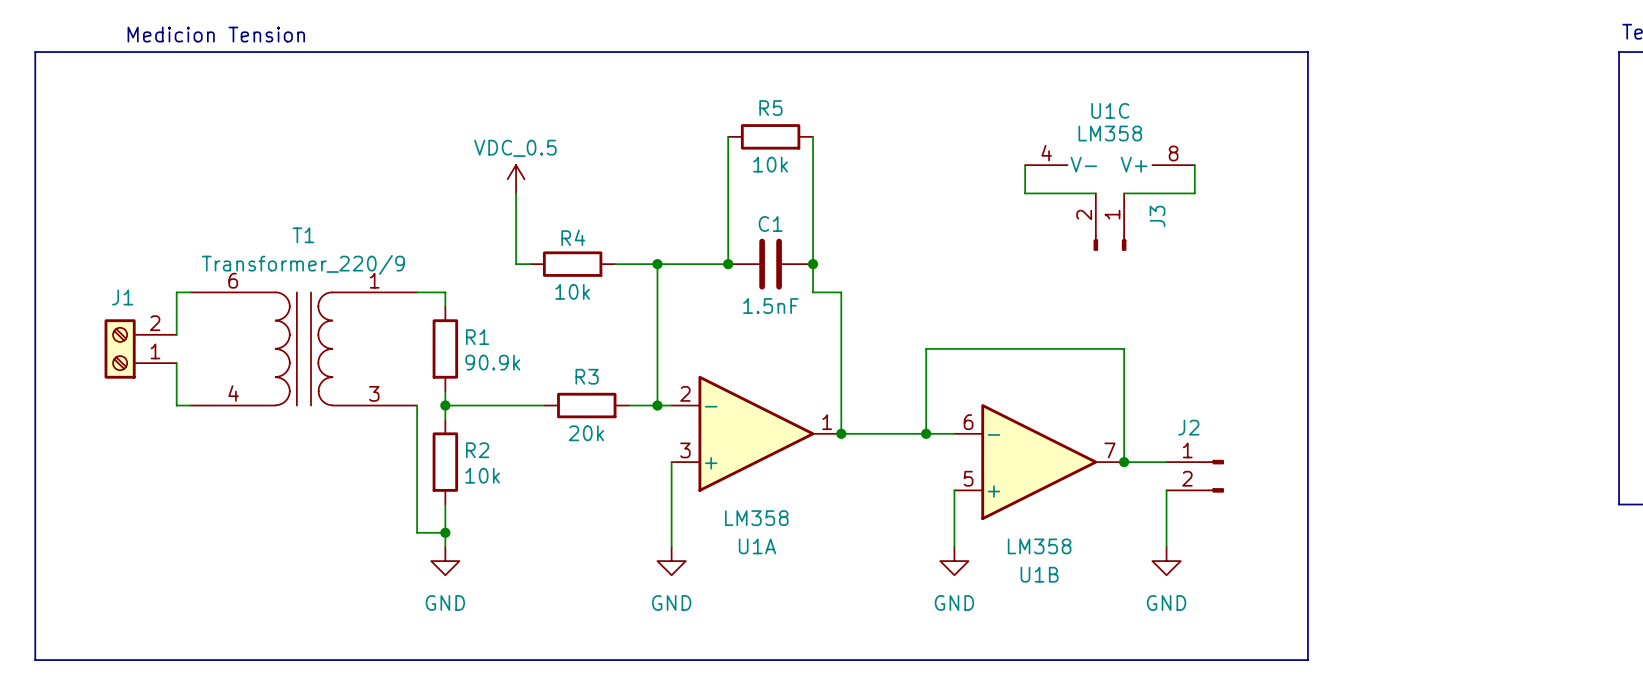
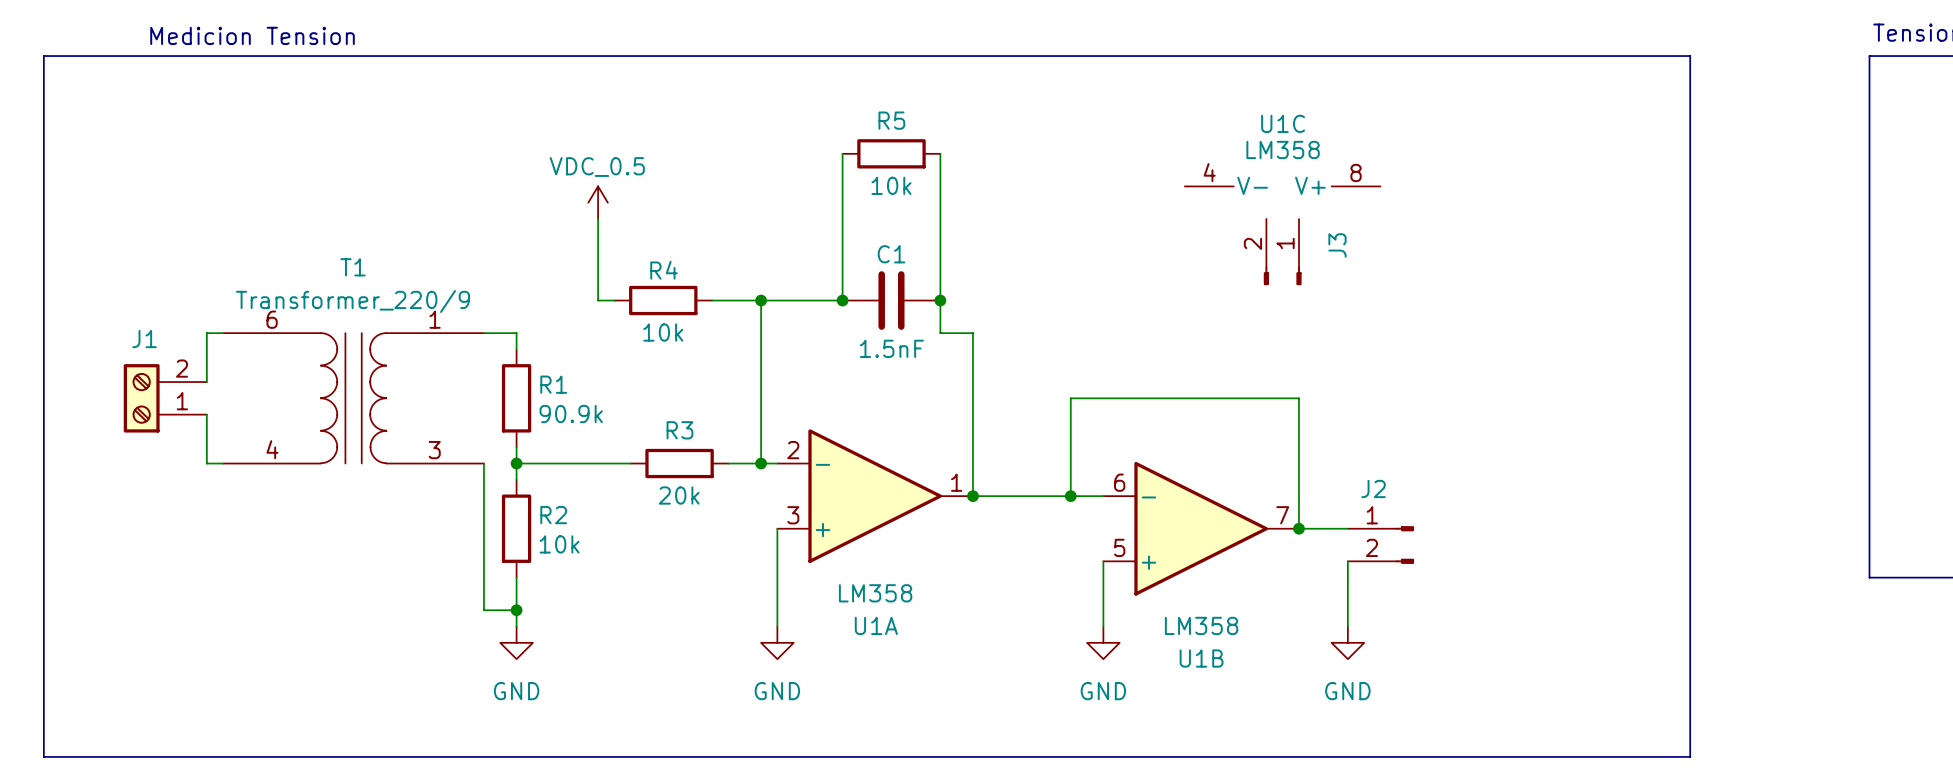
line: (1307, 52) (1307, 660) -> (1510, 56) (1690, 56) (1690, 756) (1510, 756)
wire: (1025, 165) (1025, 193) (1095, 193) -> none
wire: (1194, 165) (1194, 193) (1124, 193) -> none

